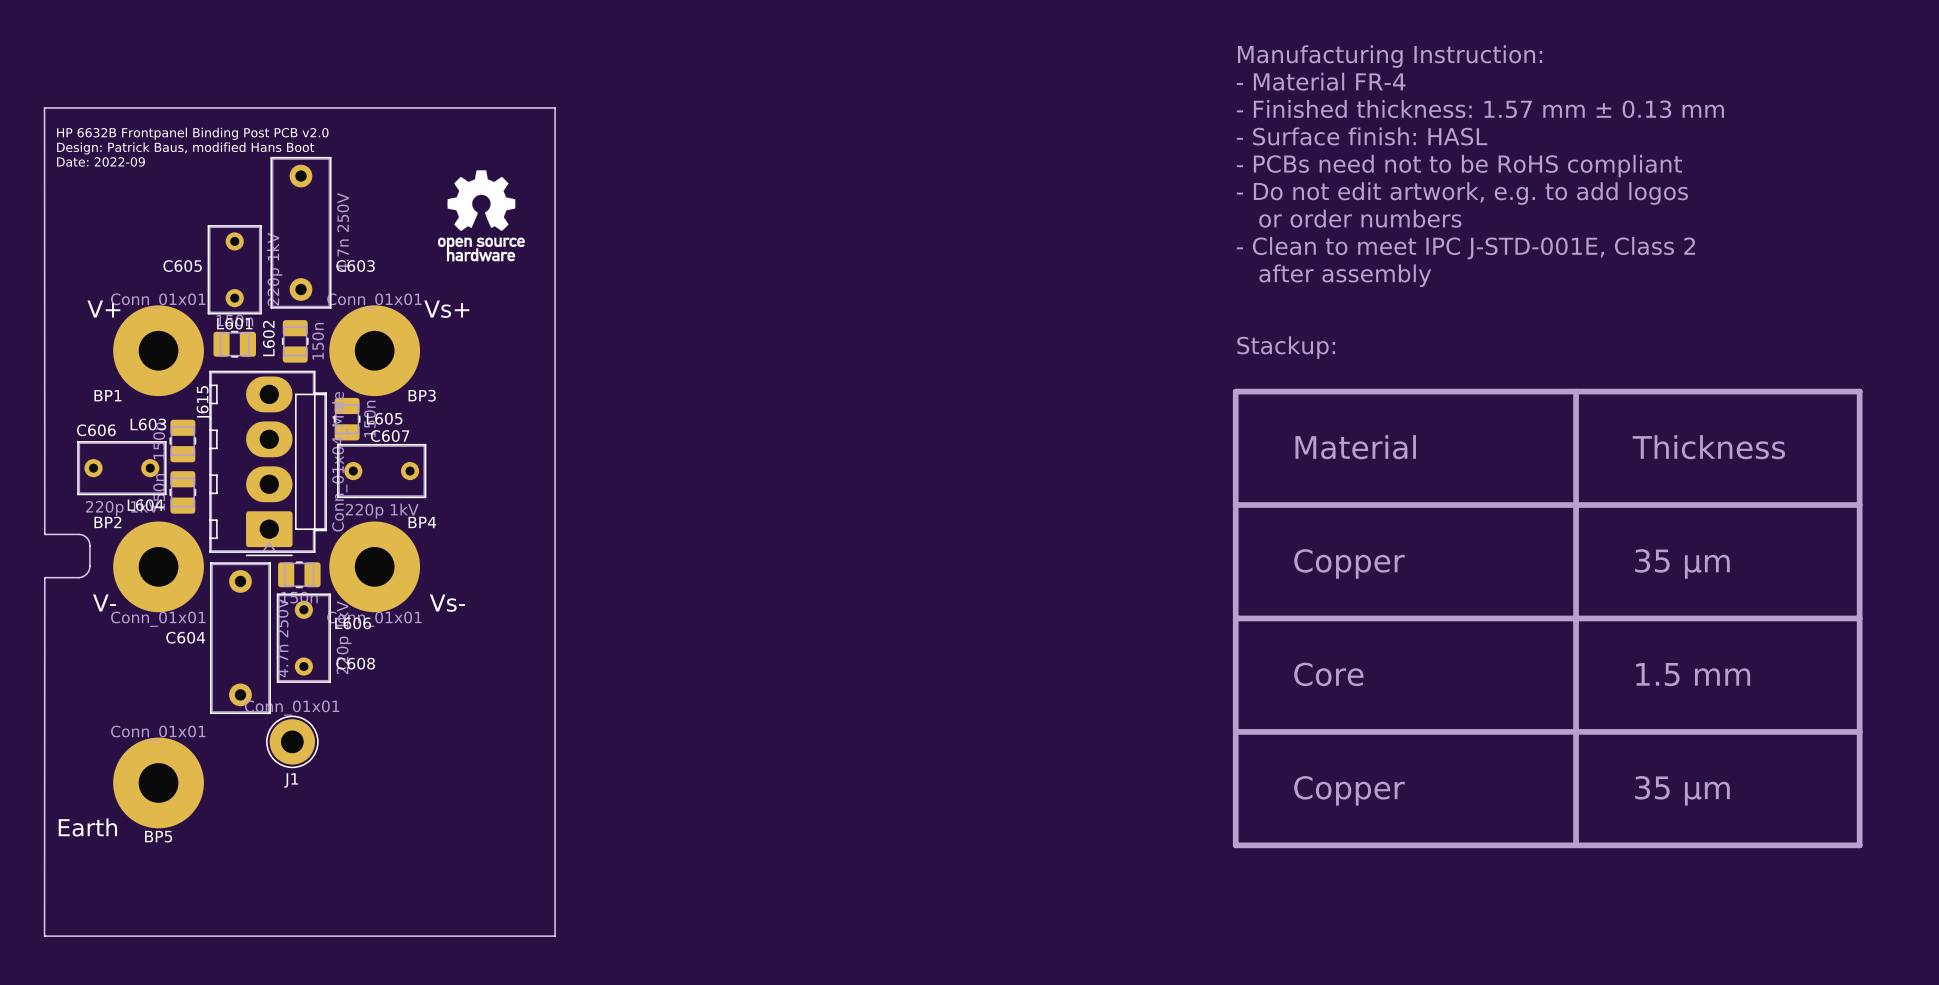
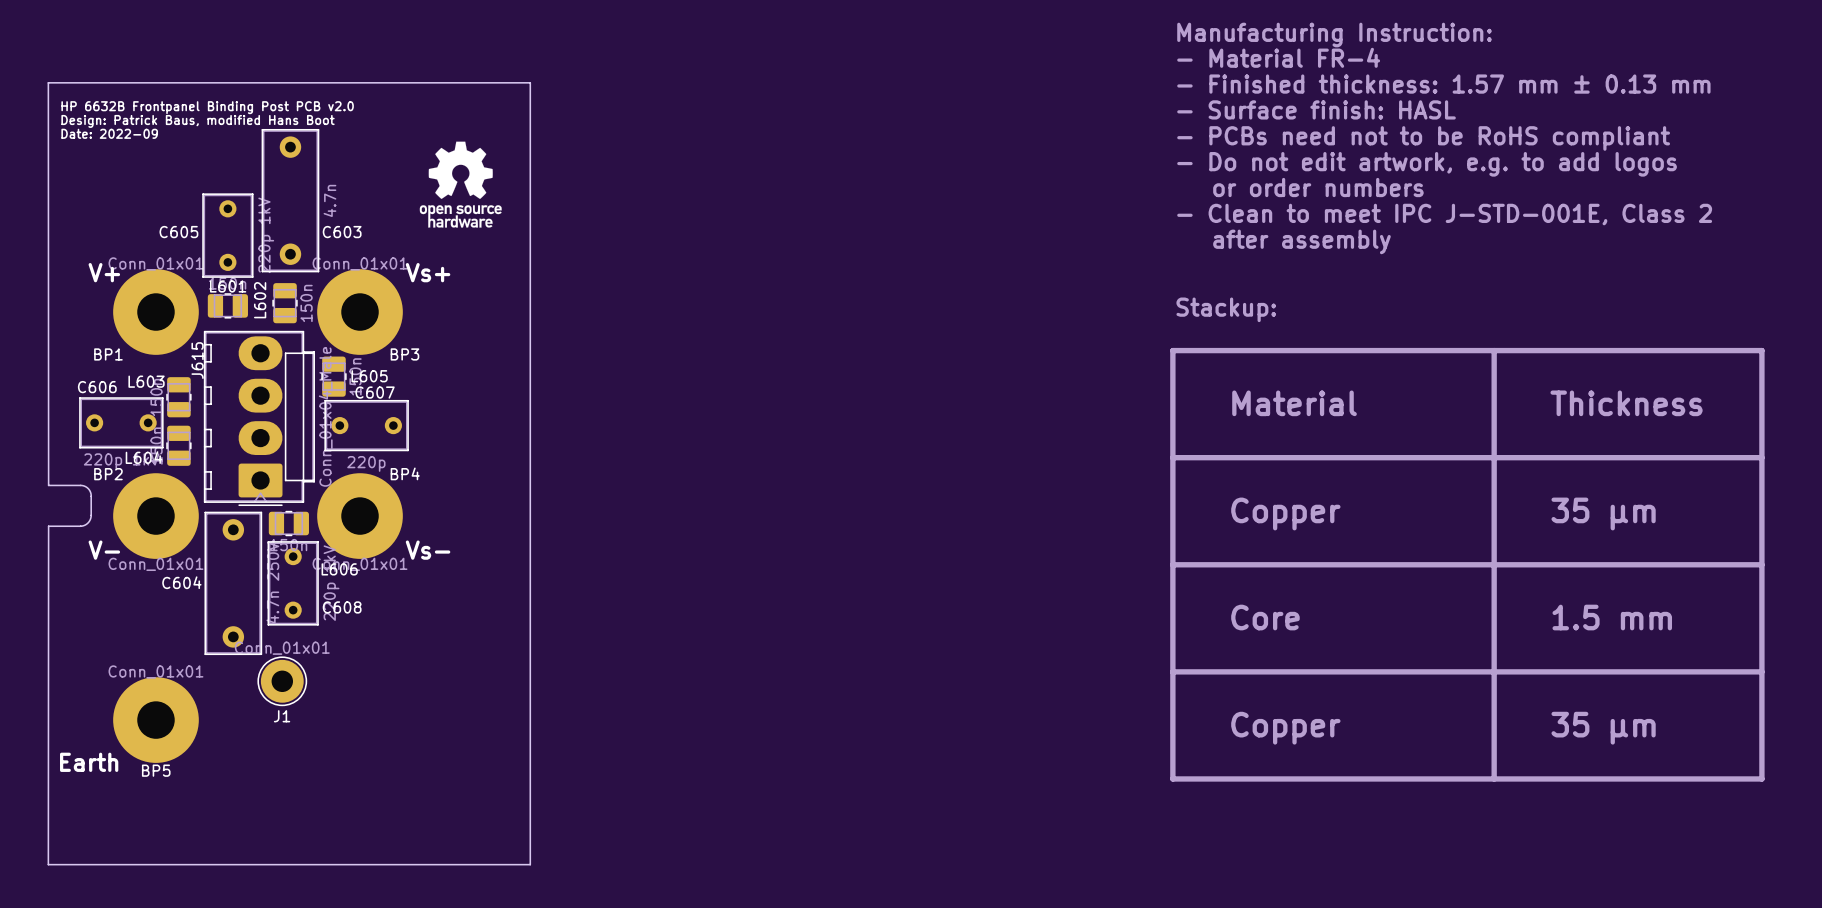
C603 value: 4.7n 250V (343, 232) -> 4.7n (329, 200)
C607 value: 220p 1kV (382, 511) -> 220p (366, 463)

